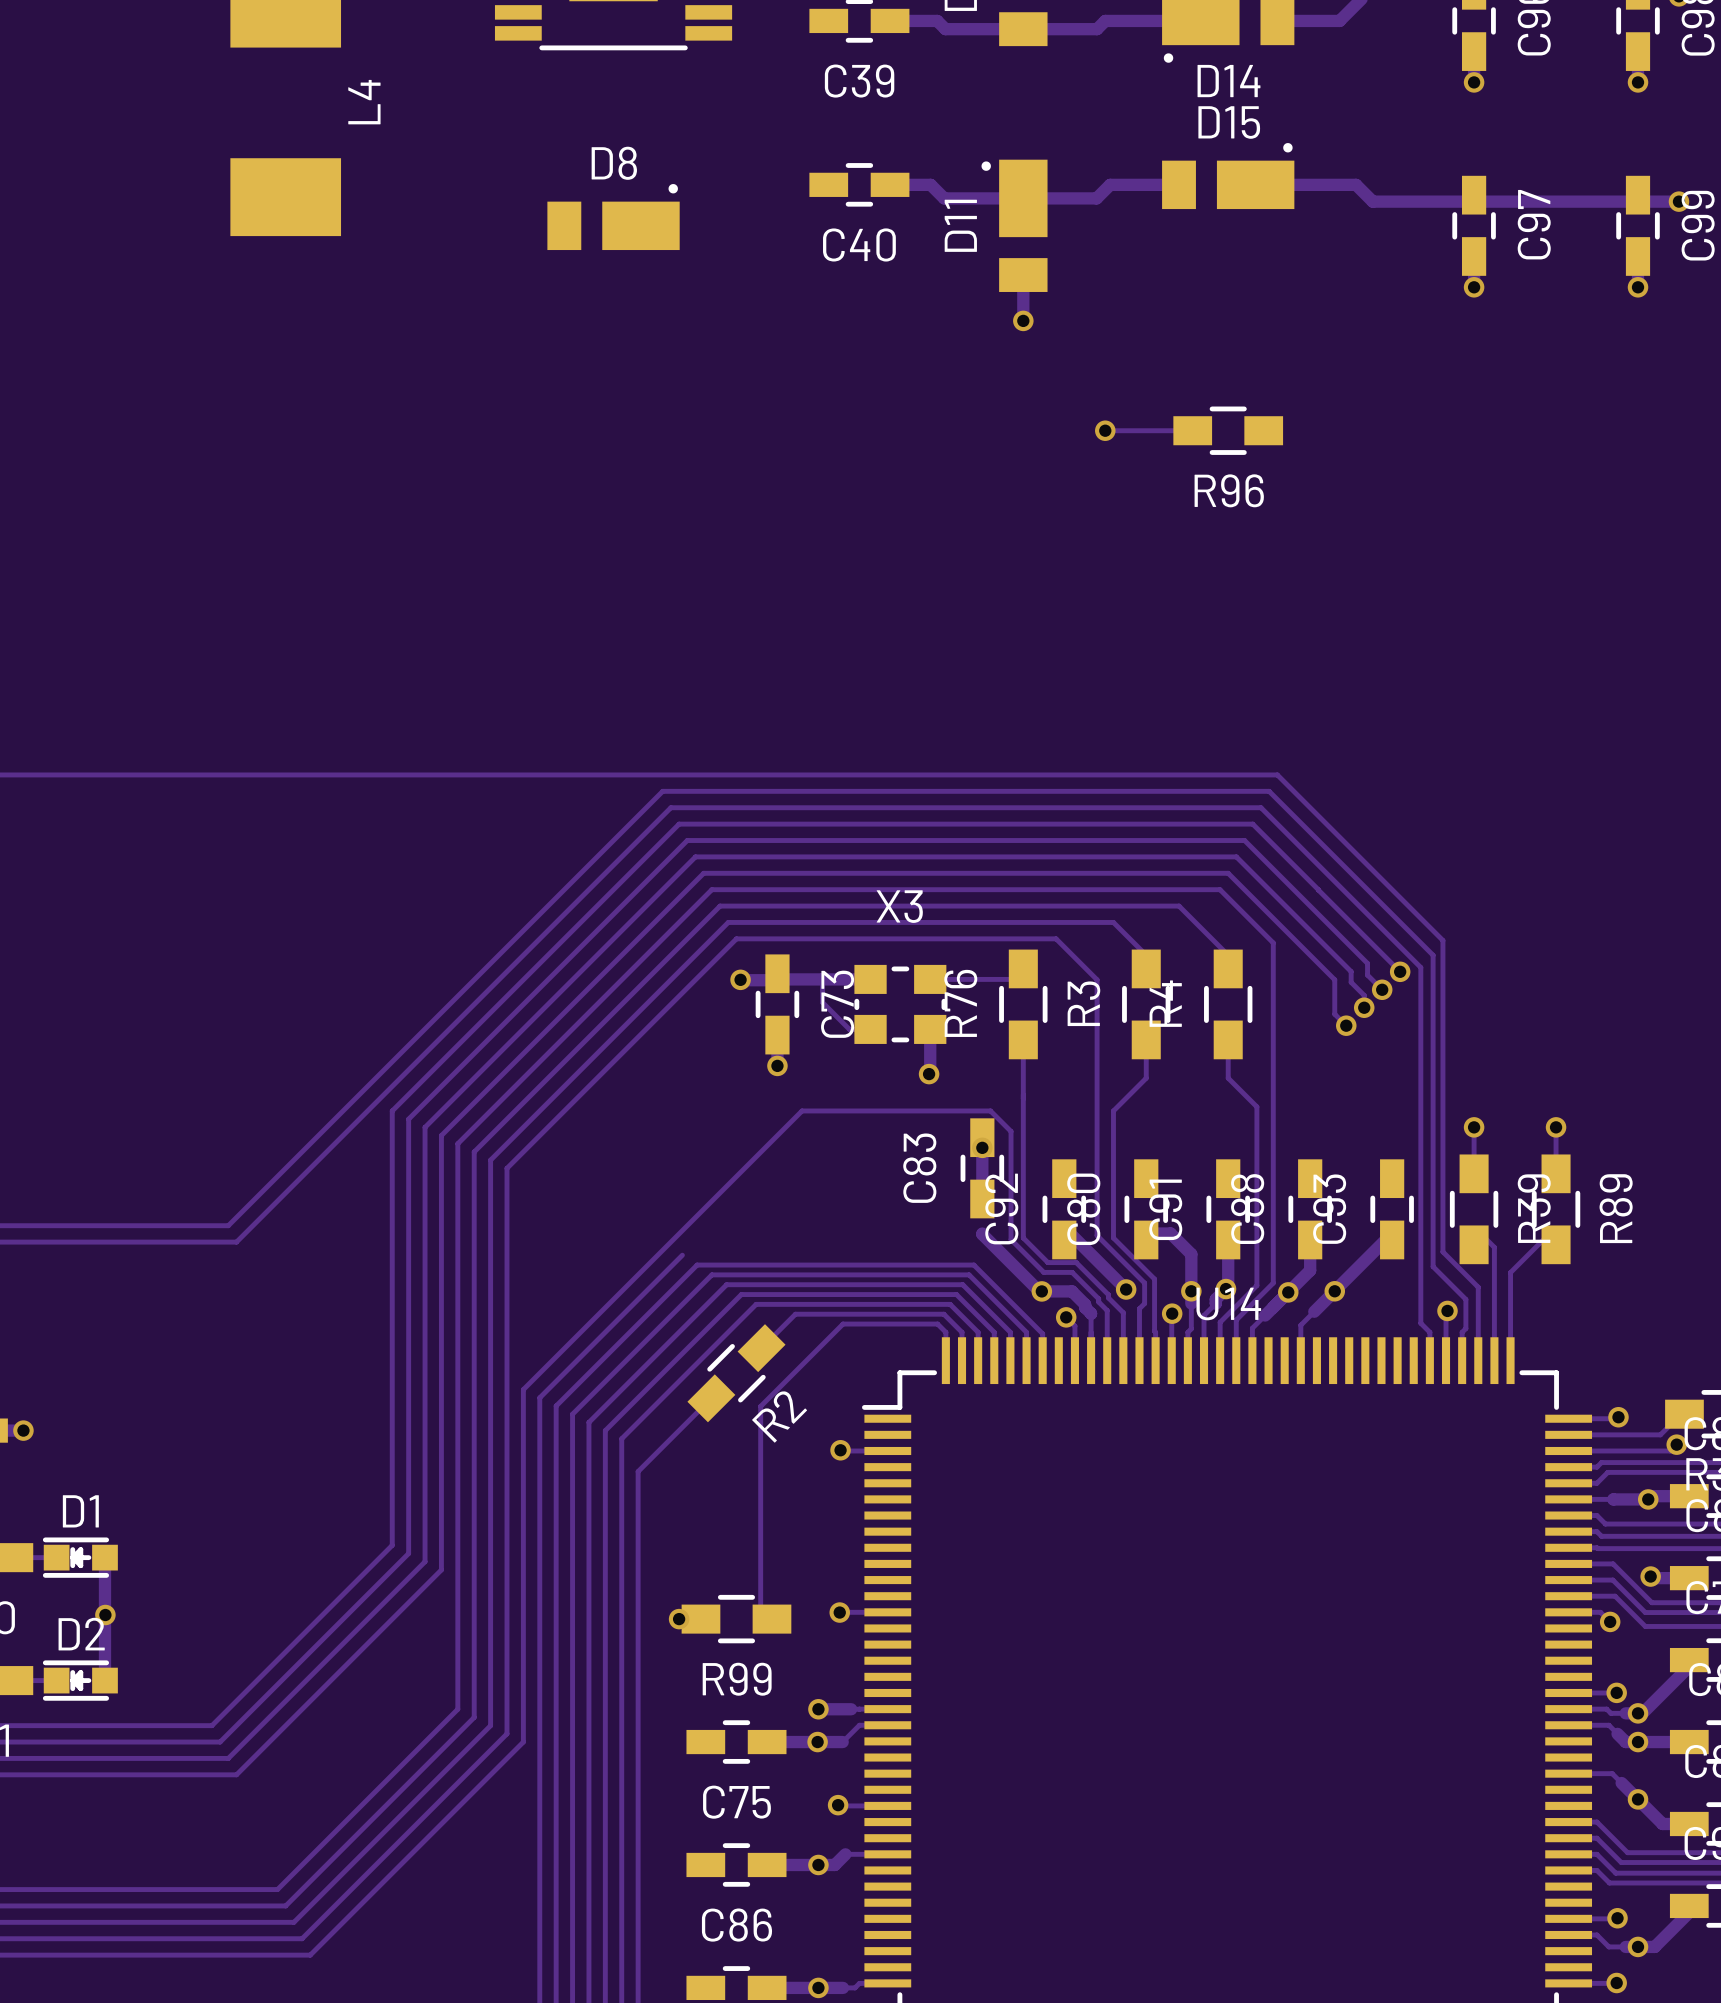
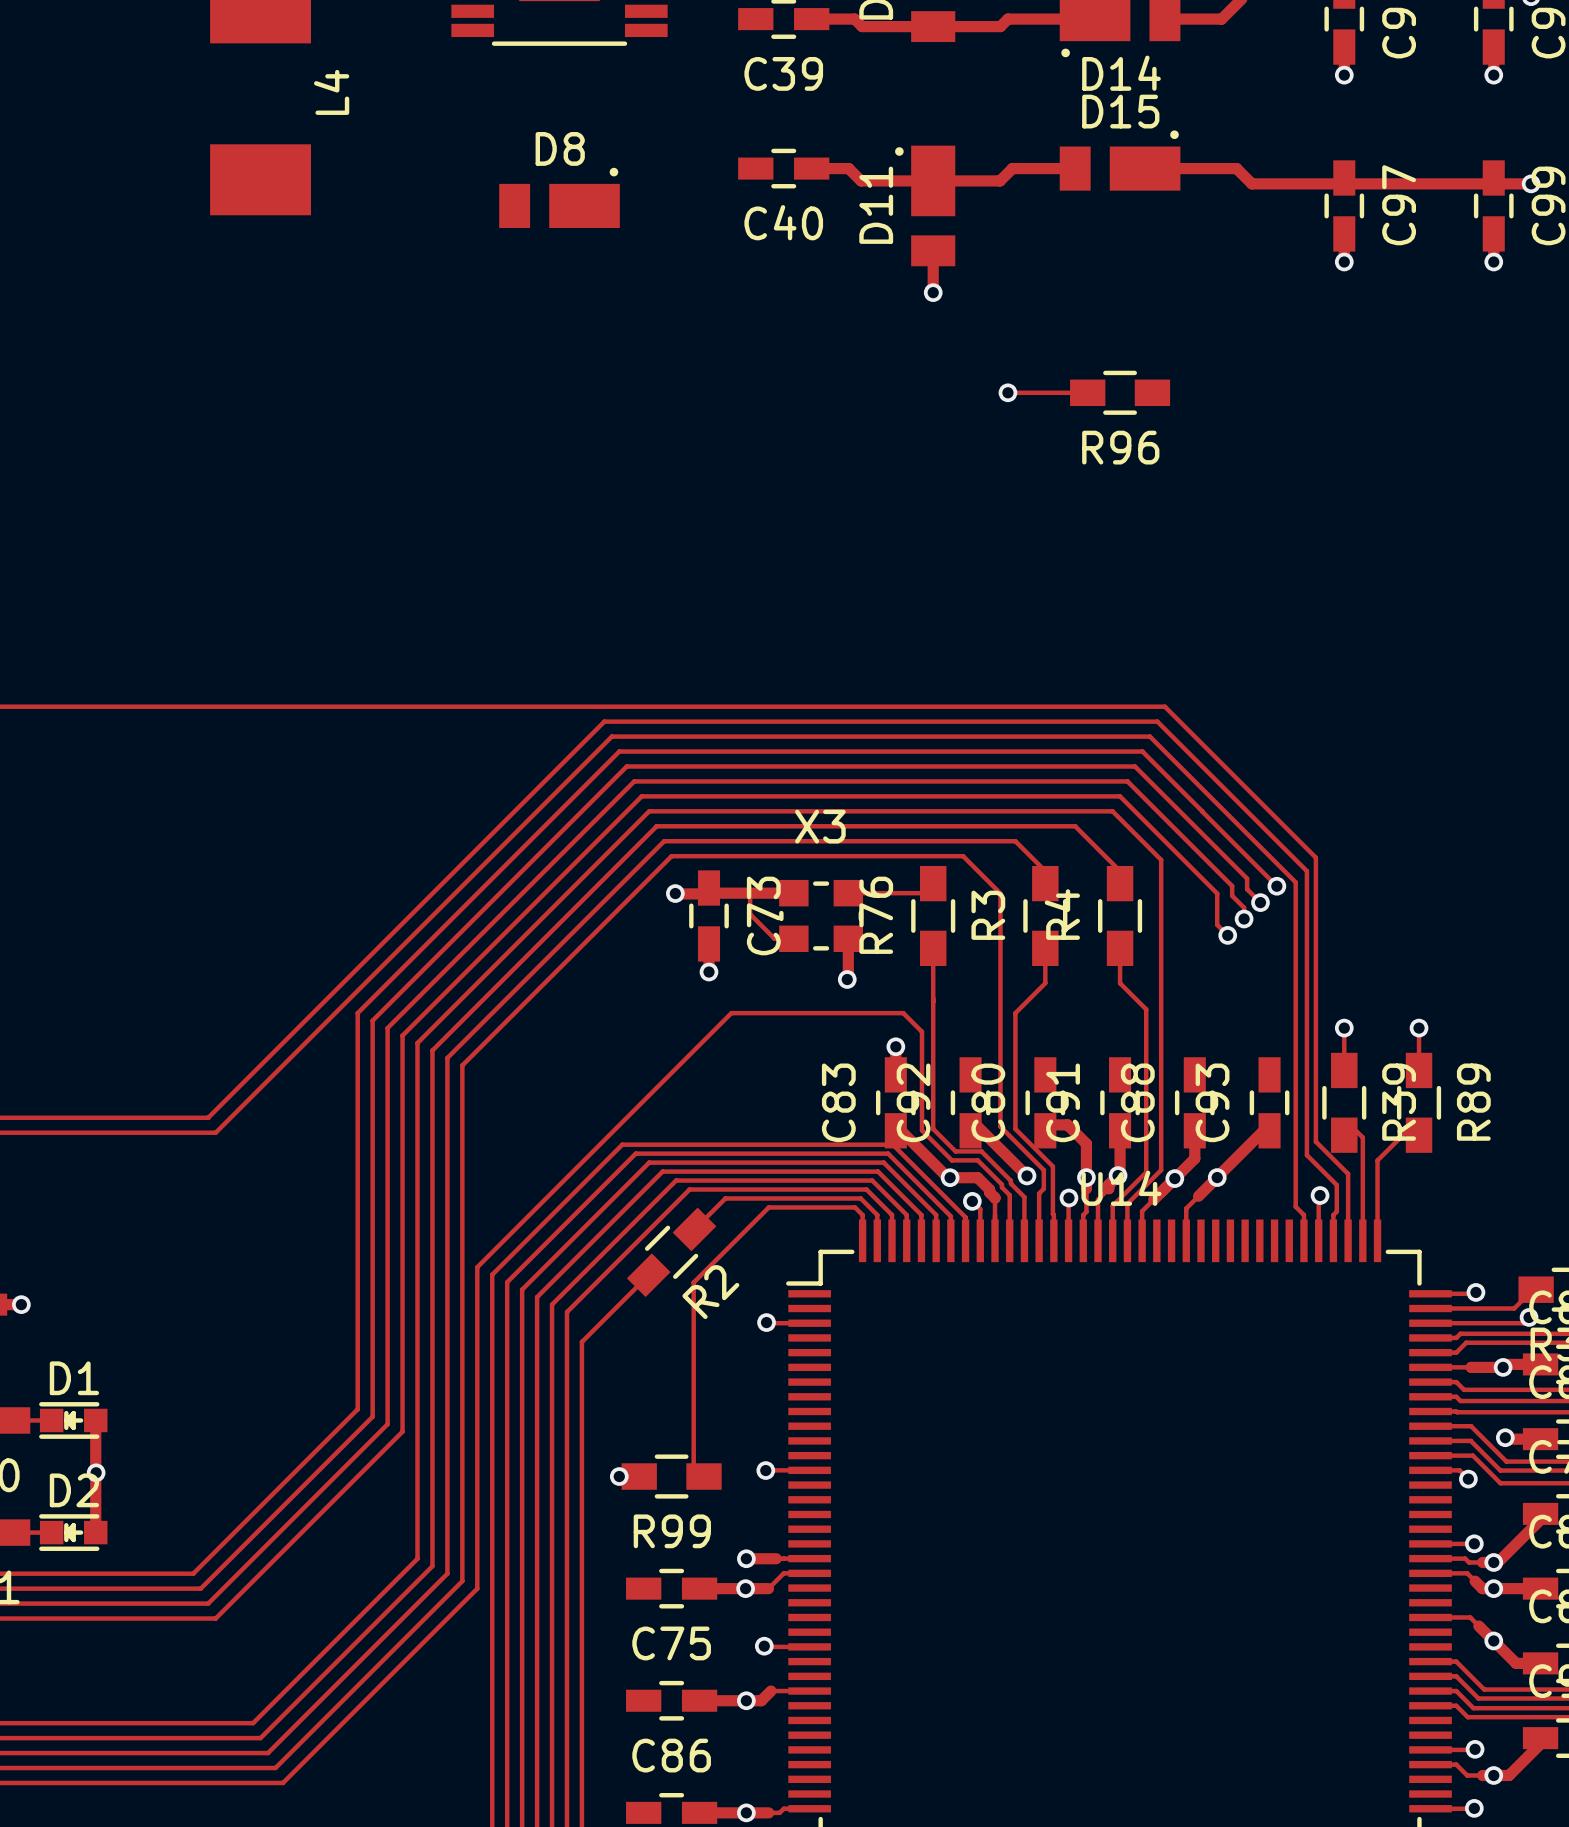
C83 position: (982, 1168) -> (895, 1102)
track: none -> (622, 1144) (892, 1144) (965, 1217) (965, 1240)

